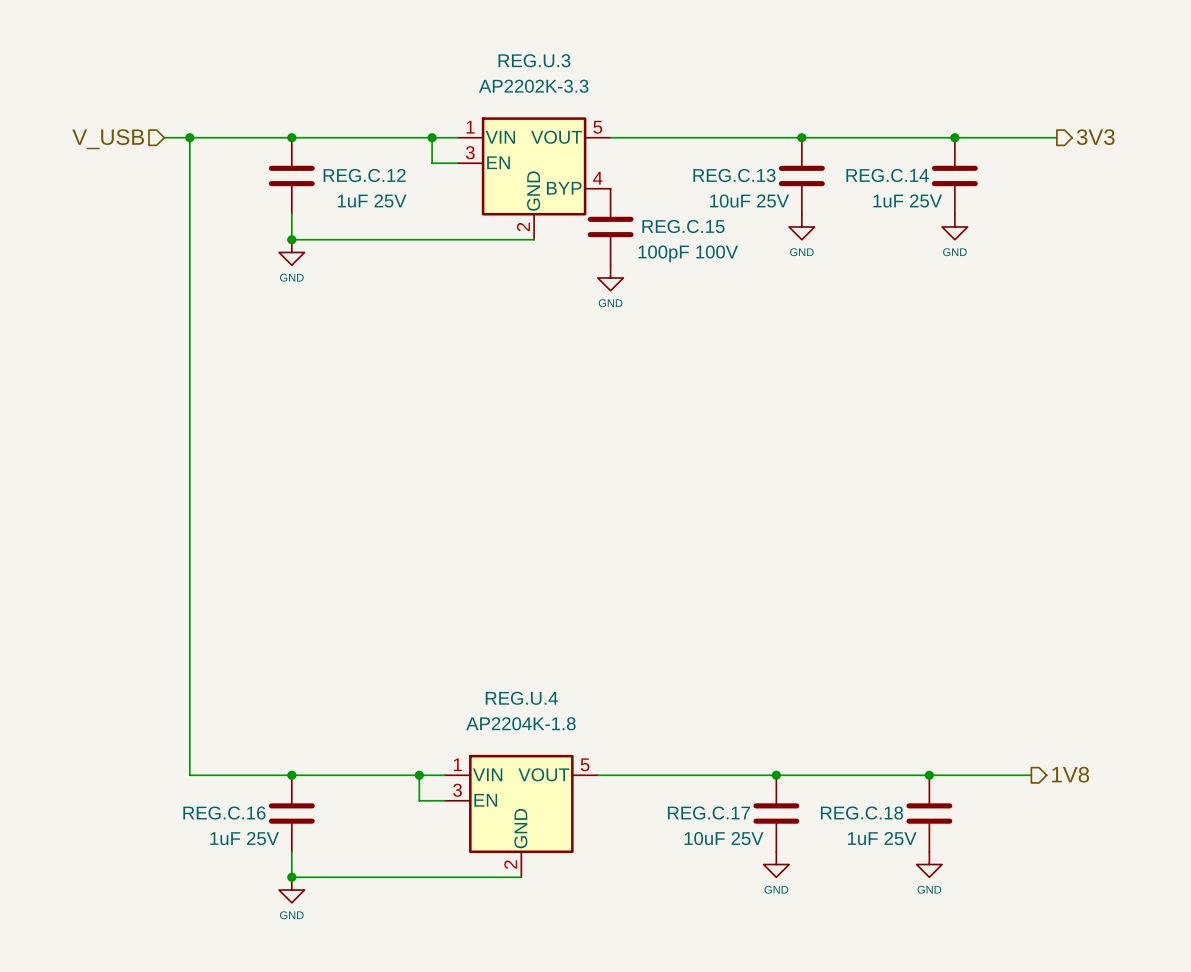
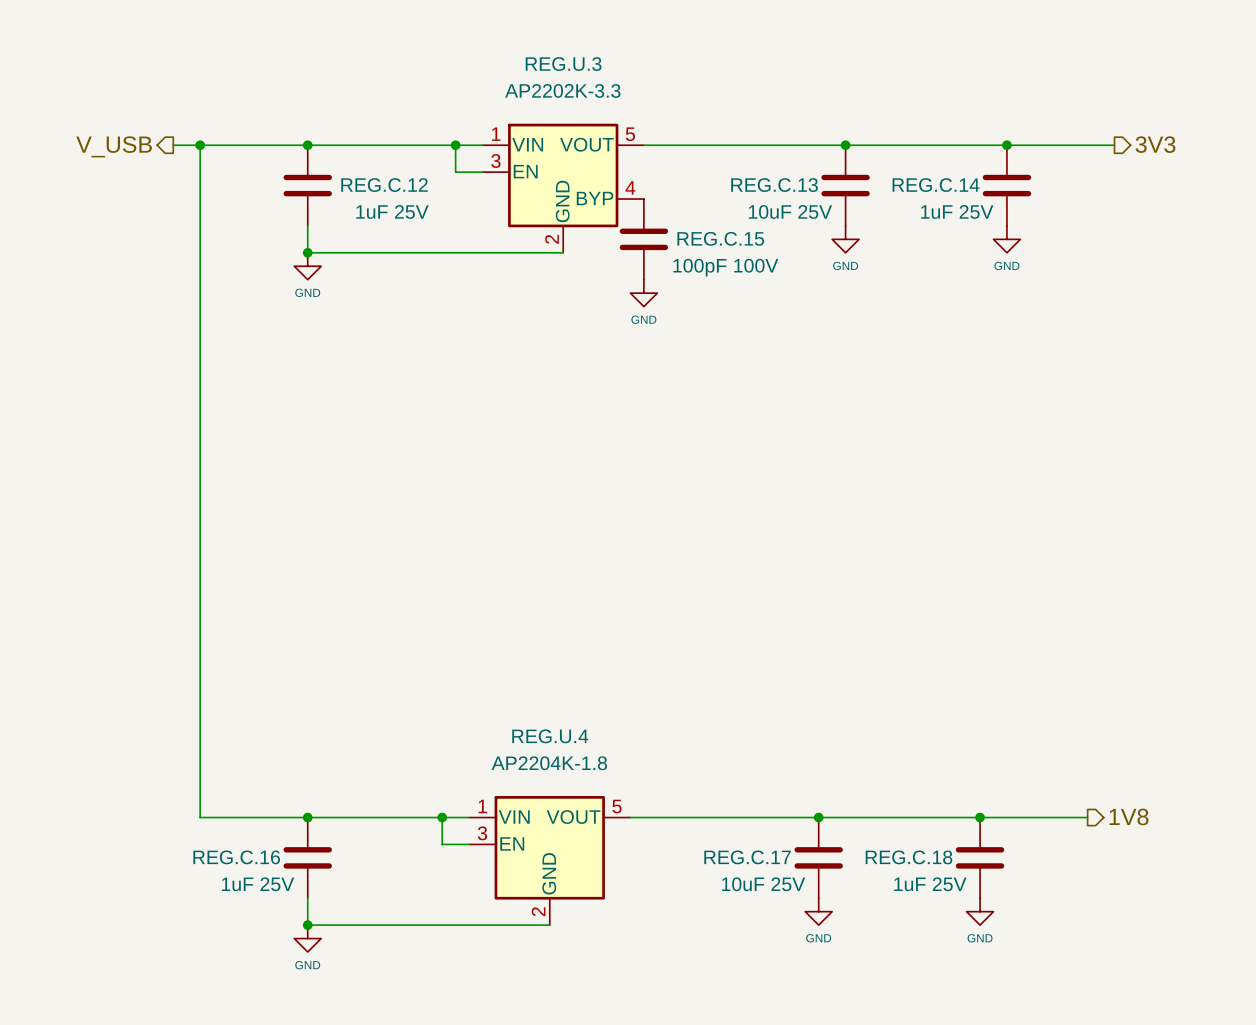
hierarchical label shape: input (108, 139) -> output (114, 146)

